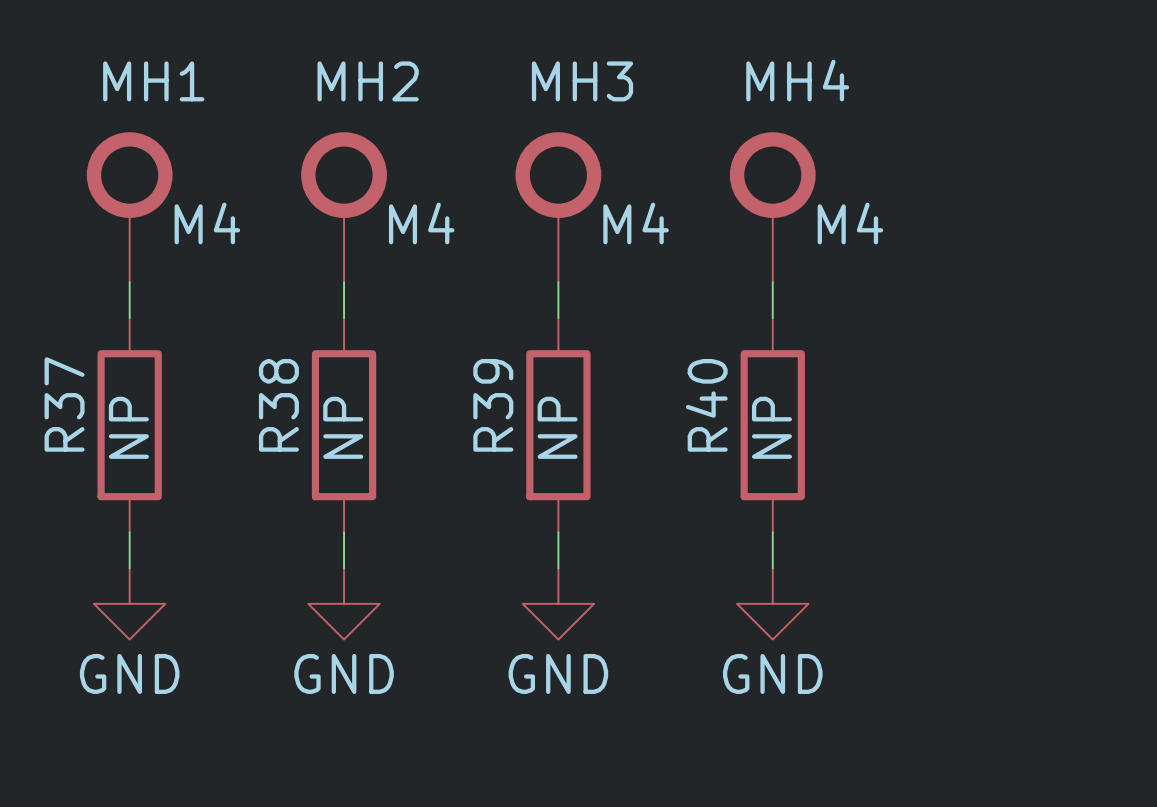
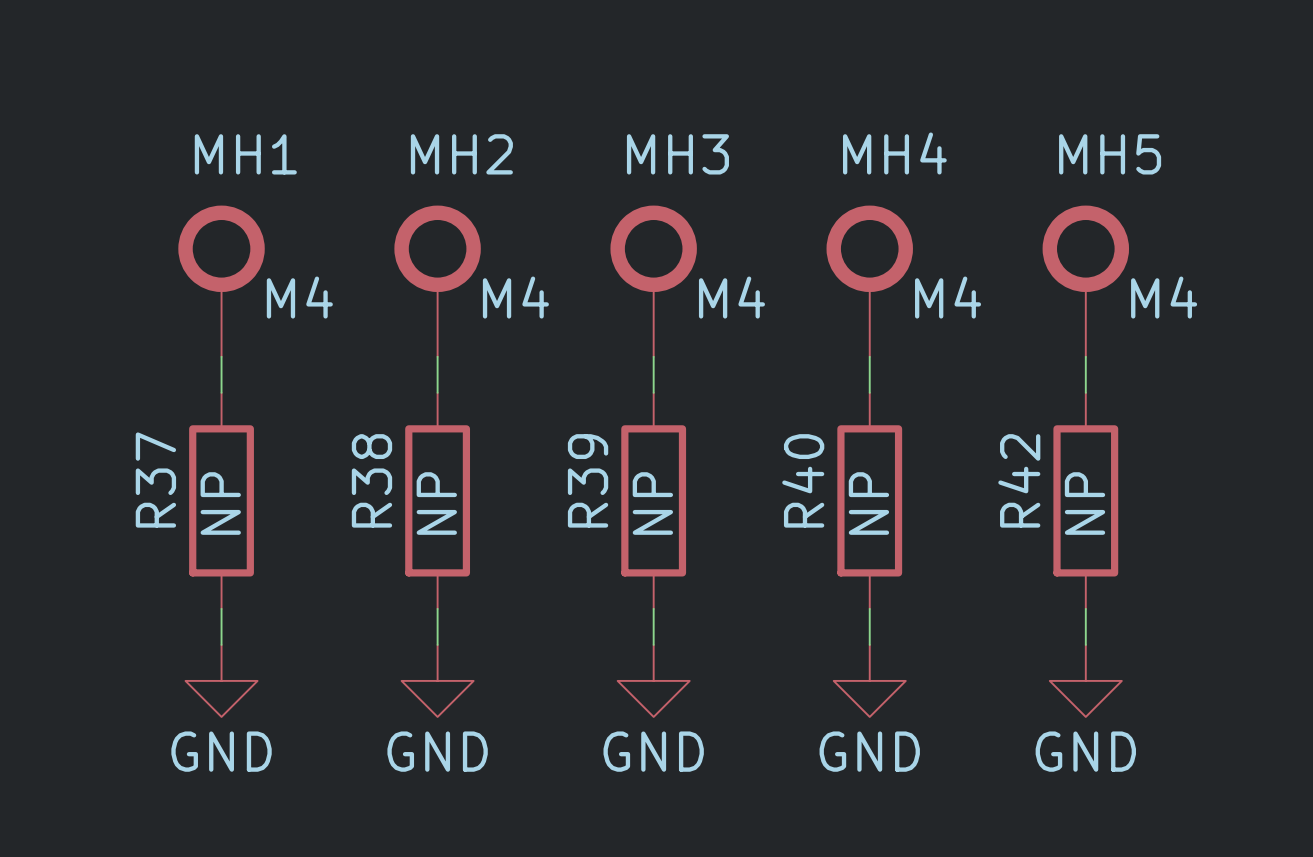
MH5: none -> (1085, 281)
wire: none -> (1085, 356) (1085, 392)
R42: none -> (1085, 500)
wire: none -> (1085, 608) (1085, 644)
power symbol: none -> GND (1085, 680)

